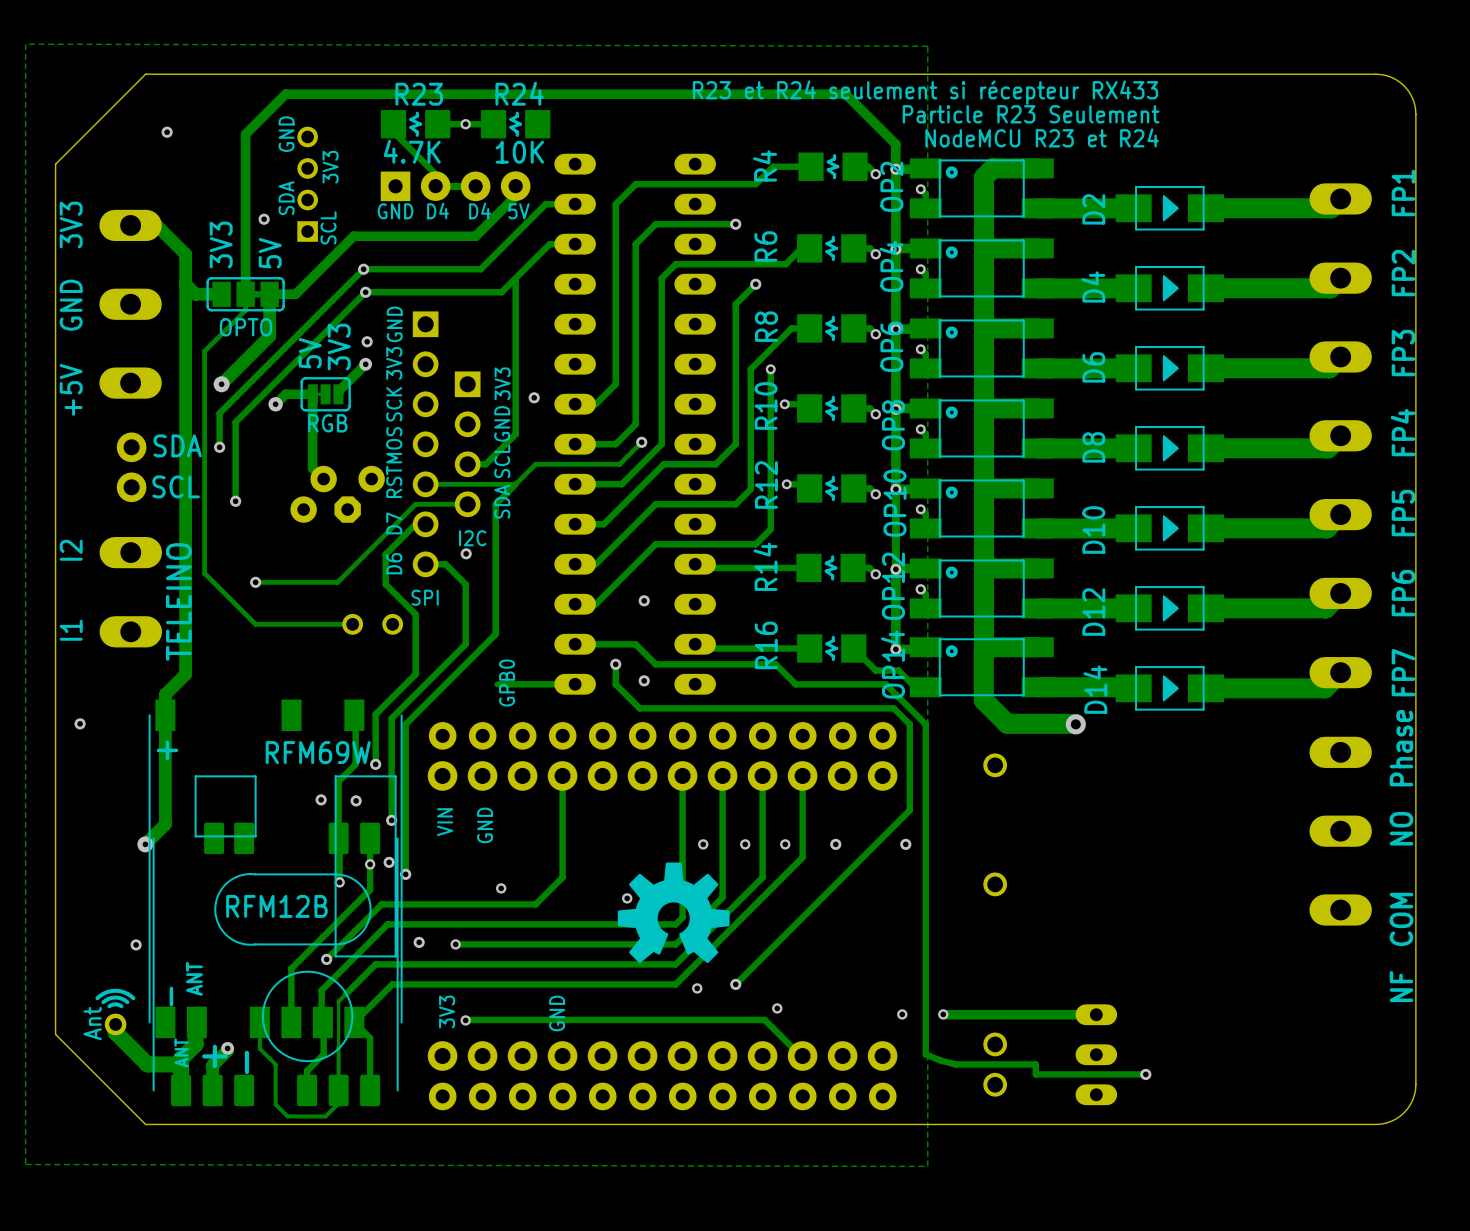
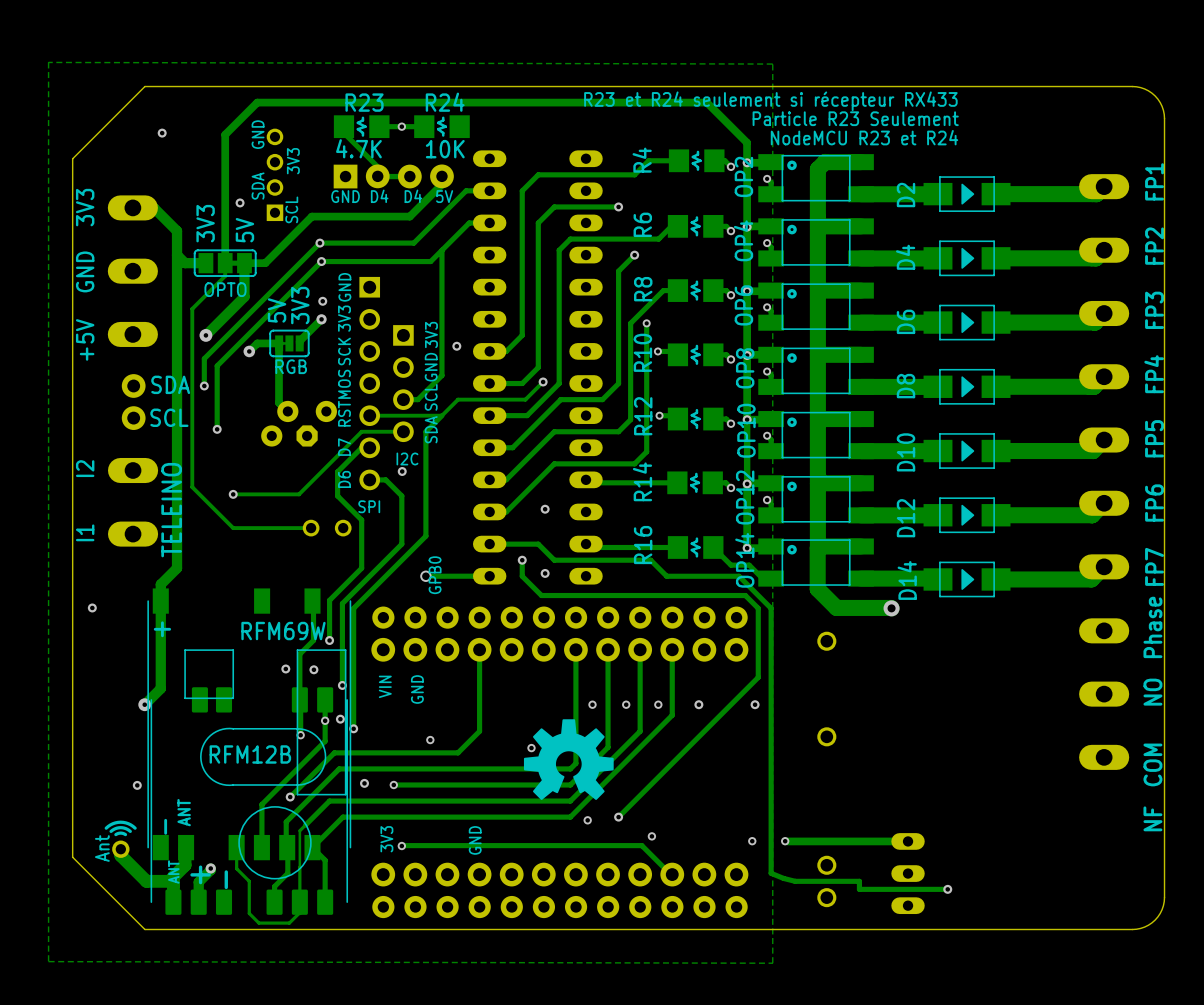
via: none -> (425, 576)

